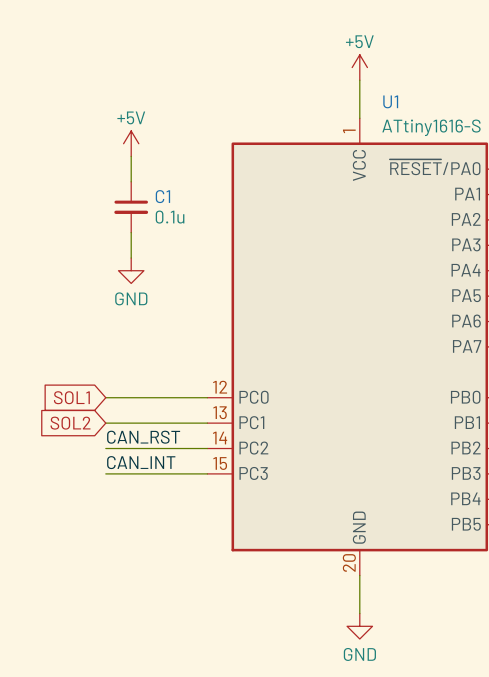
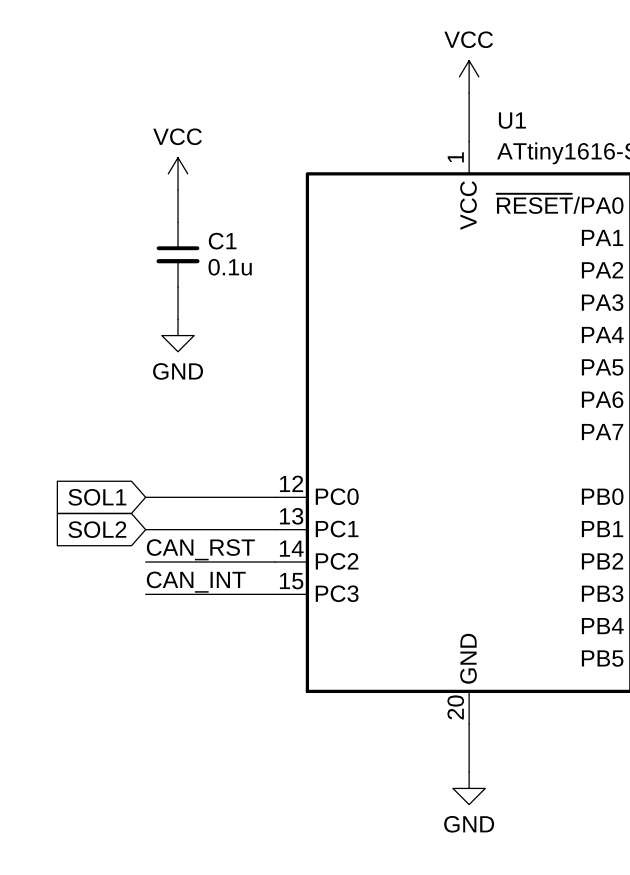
power symbol: +5V (359, 67) -> VCC (469, 76)
power symbol: +5V (131, 143) -> VCC (178, 173)

